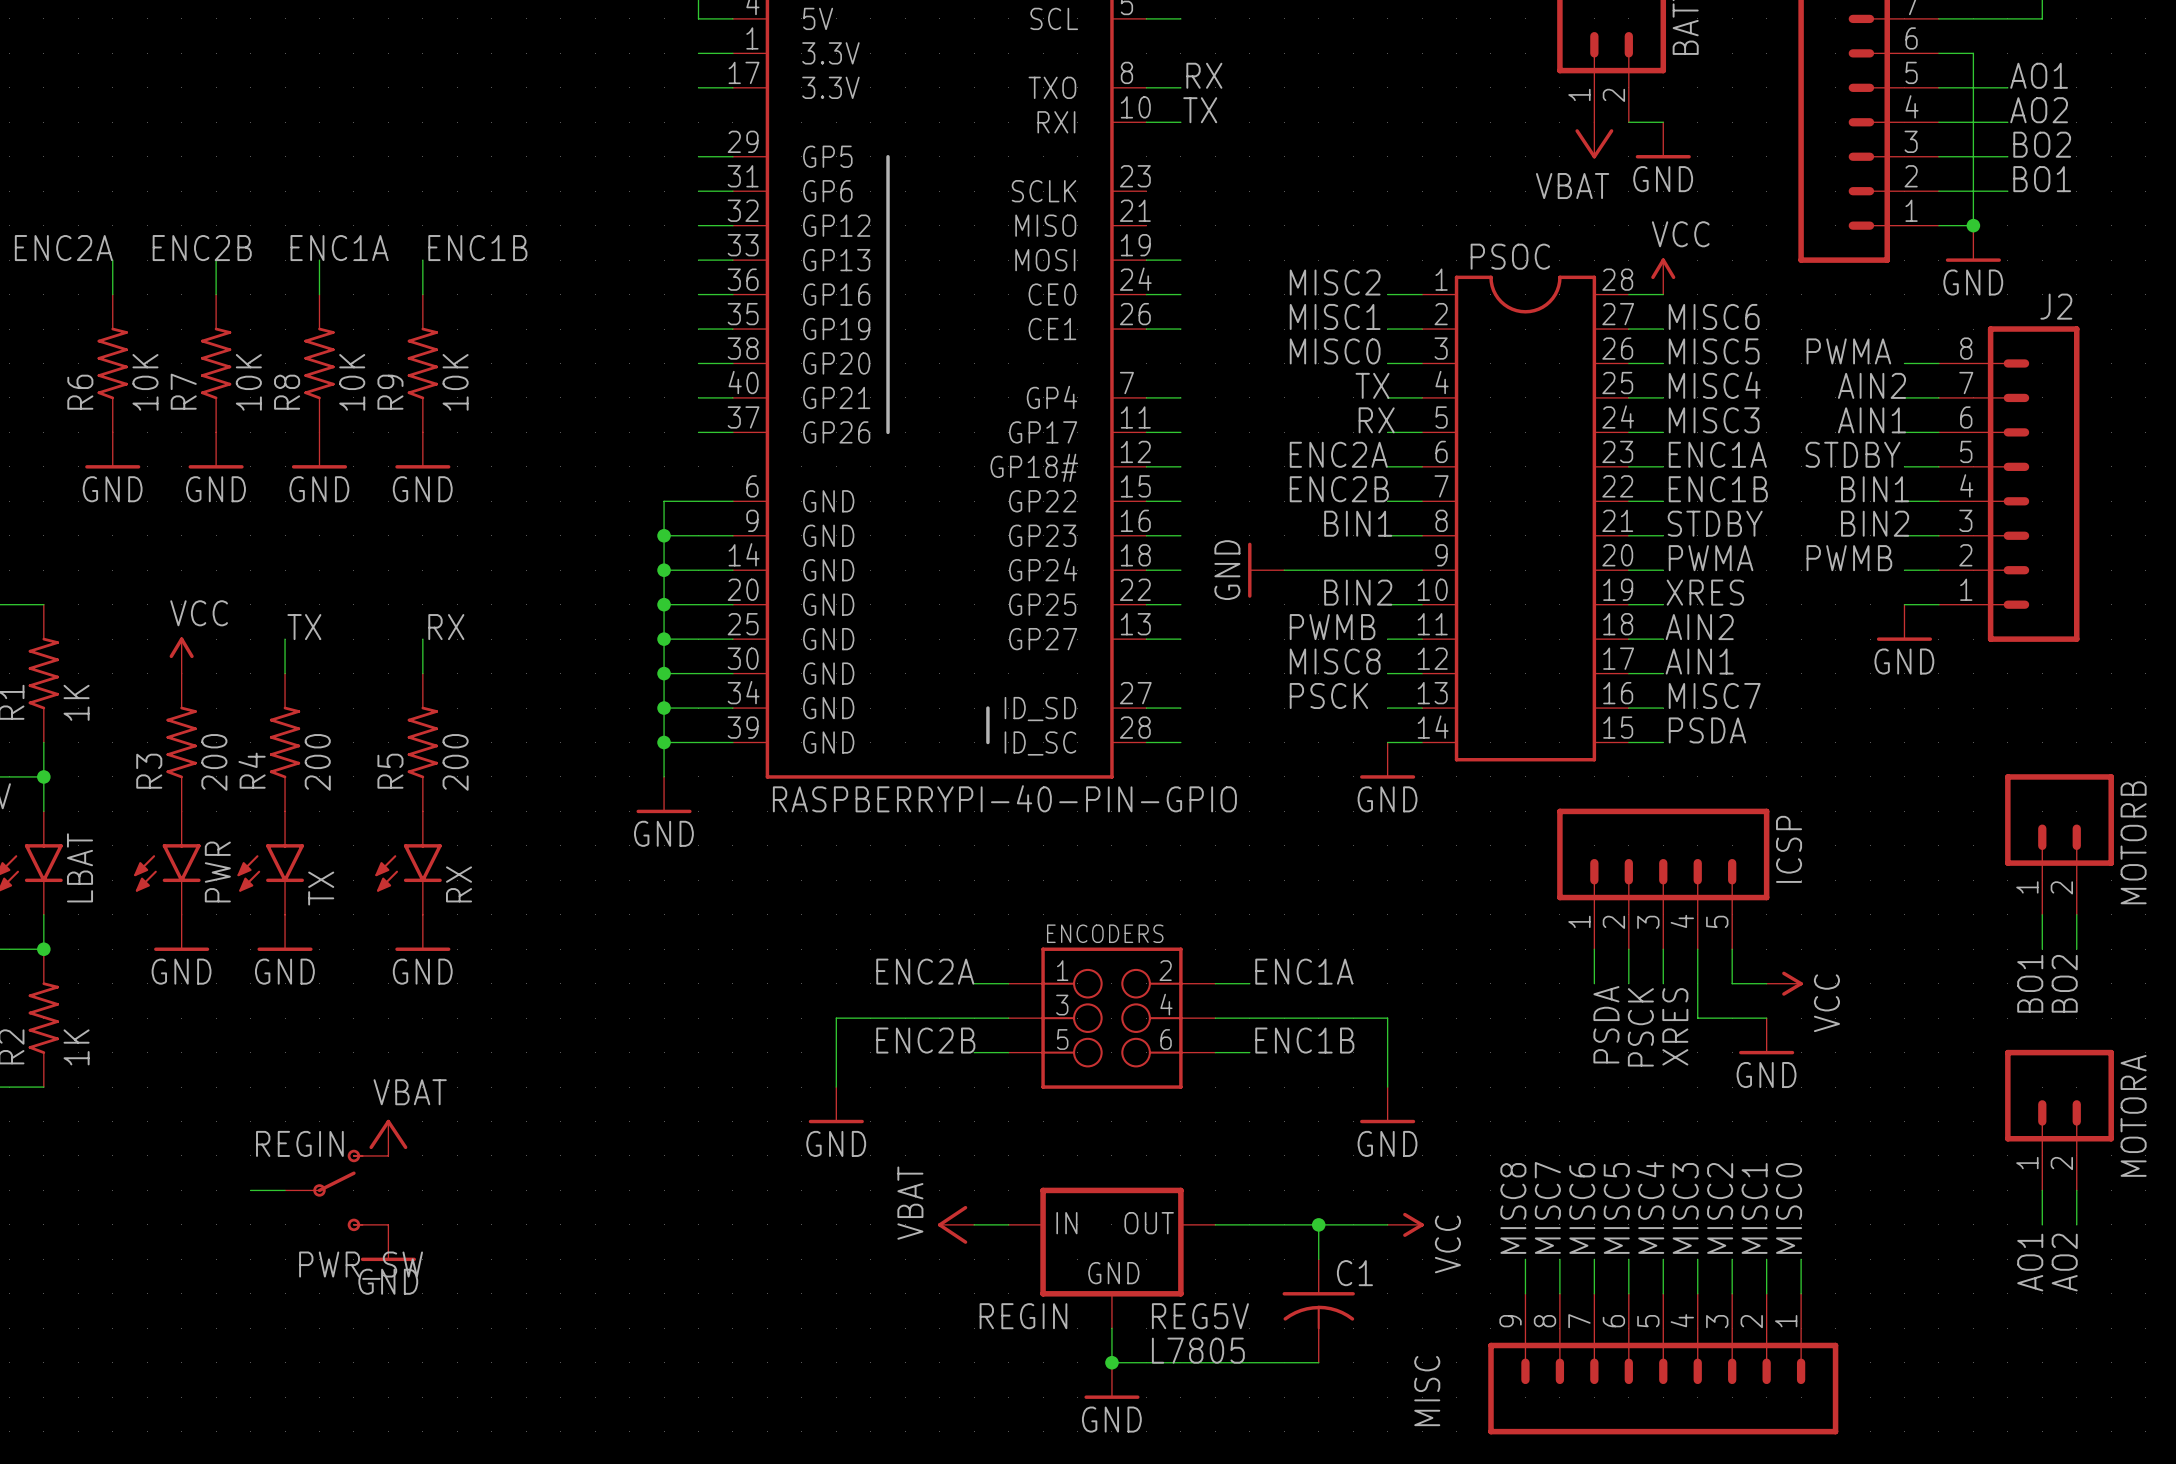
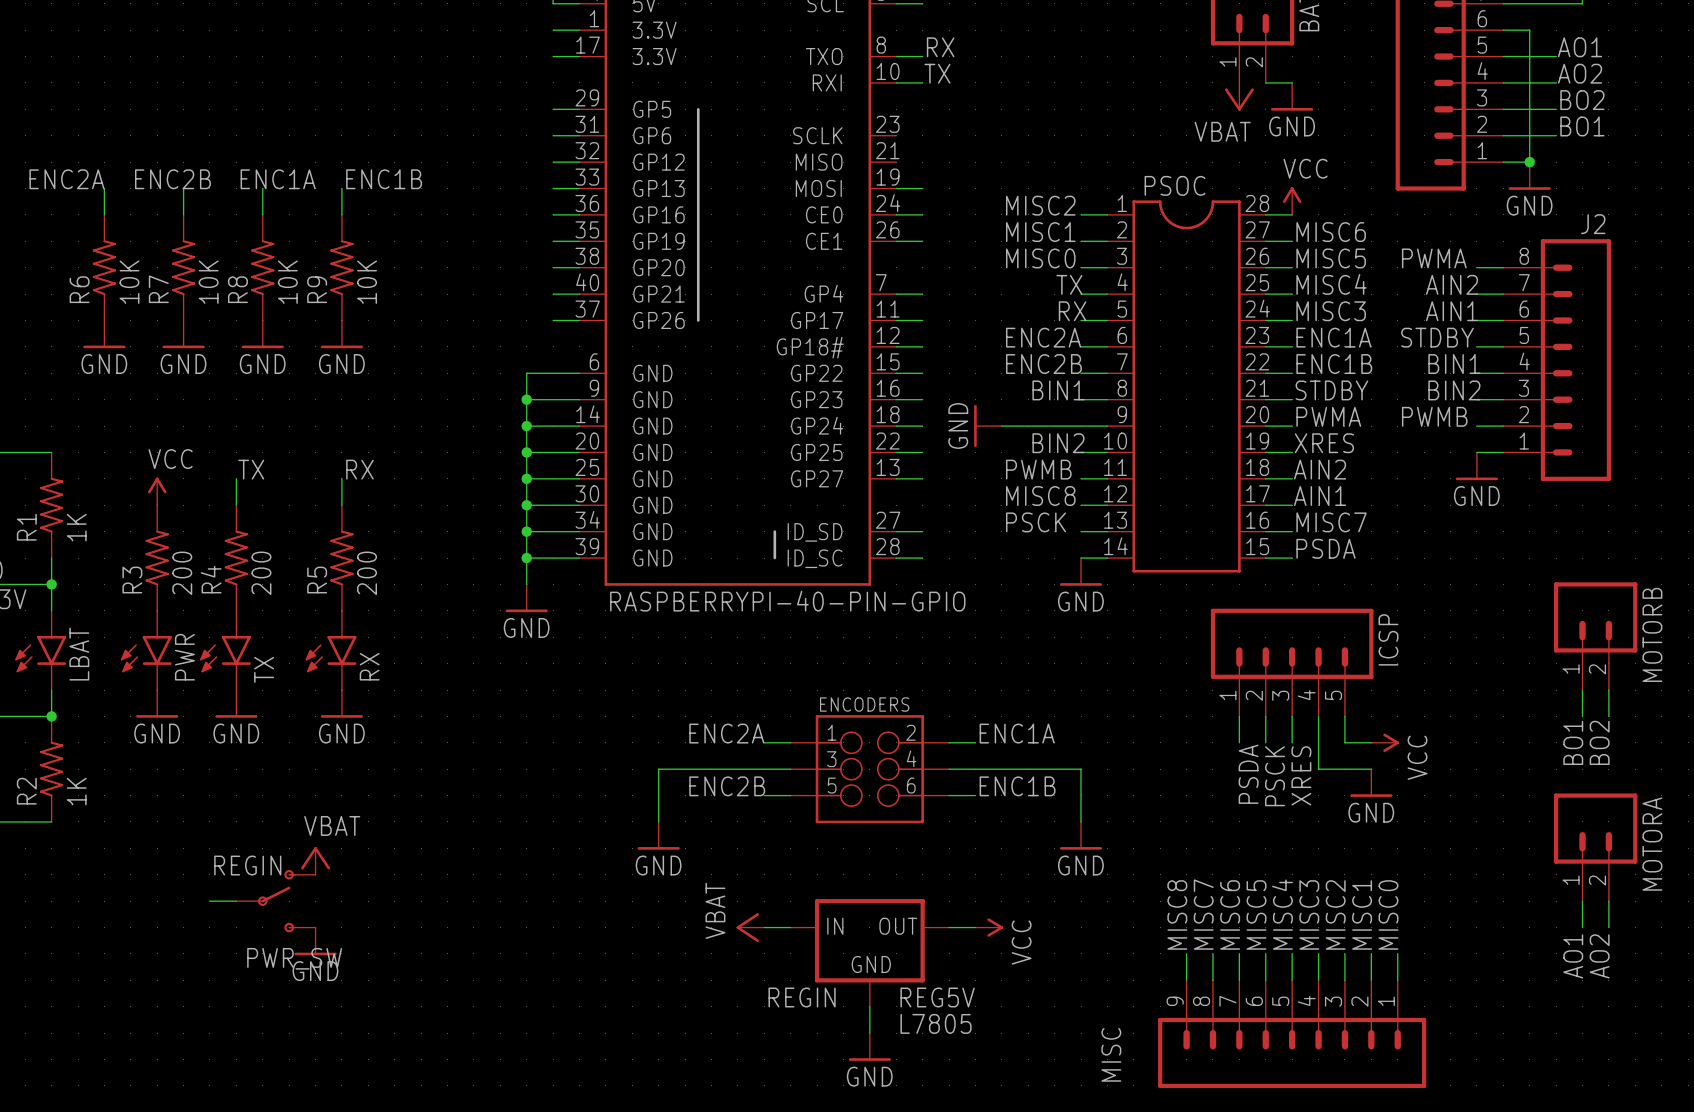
wire: (1249, 1224) (1387, 1224) -> none
wire: (1318, 1224) (1318, 1259) -> none
junction: (1318, 1224) -> none
power symbol position: VCC (1405, 1224) -> VCC (989, 927)
C1: (1318, 1311) -> none
wire: (1111, 1362) (1318, 1362) -> none
junction: (1111, 1362) -> none

